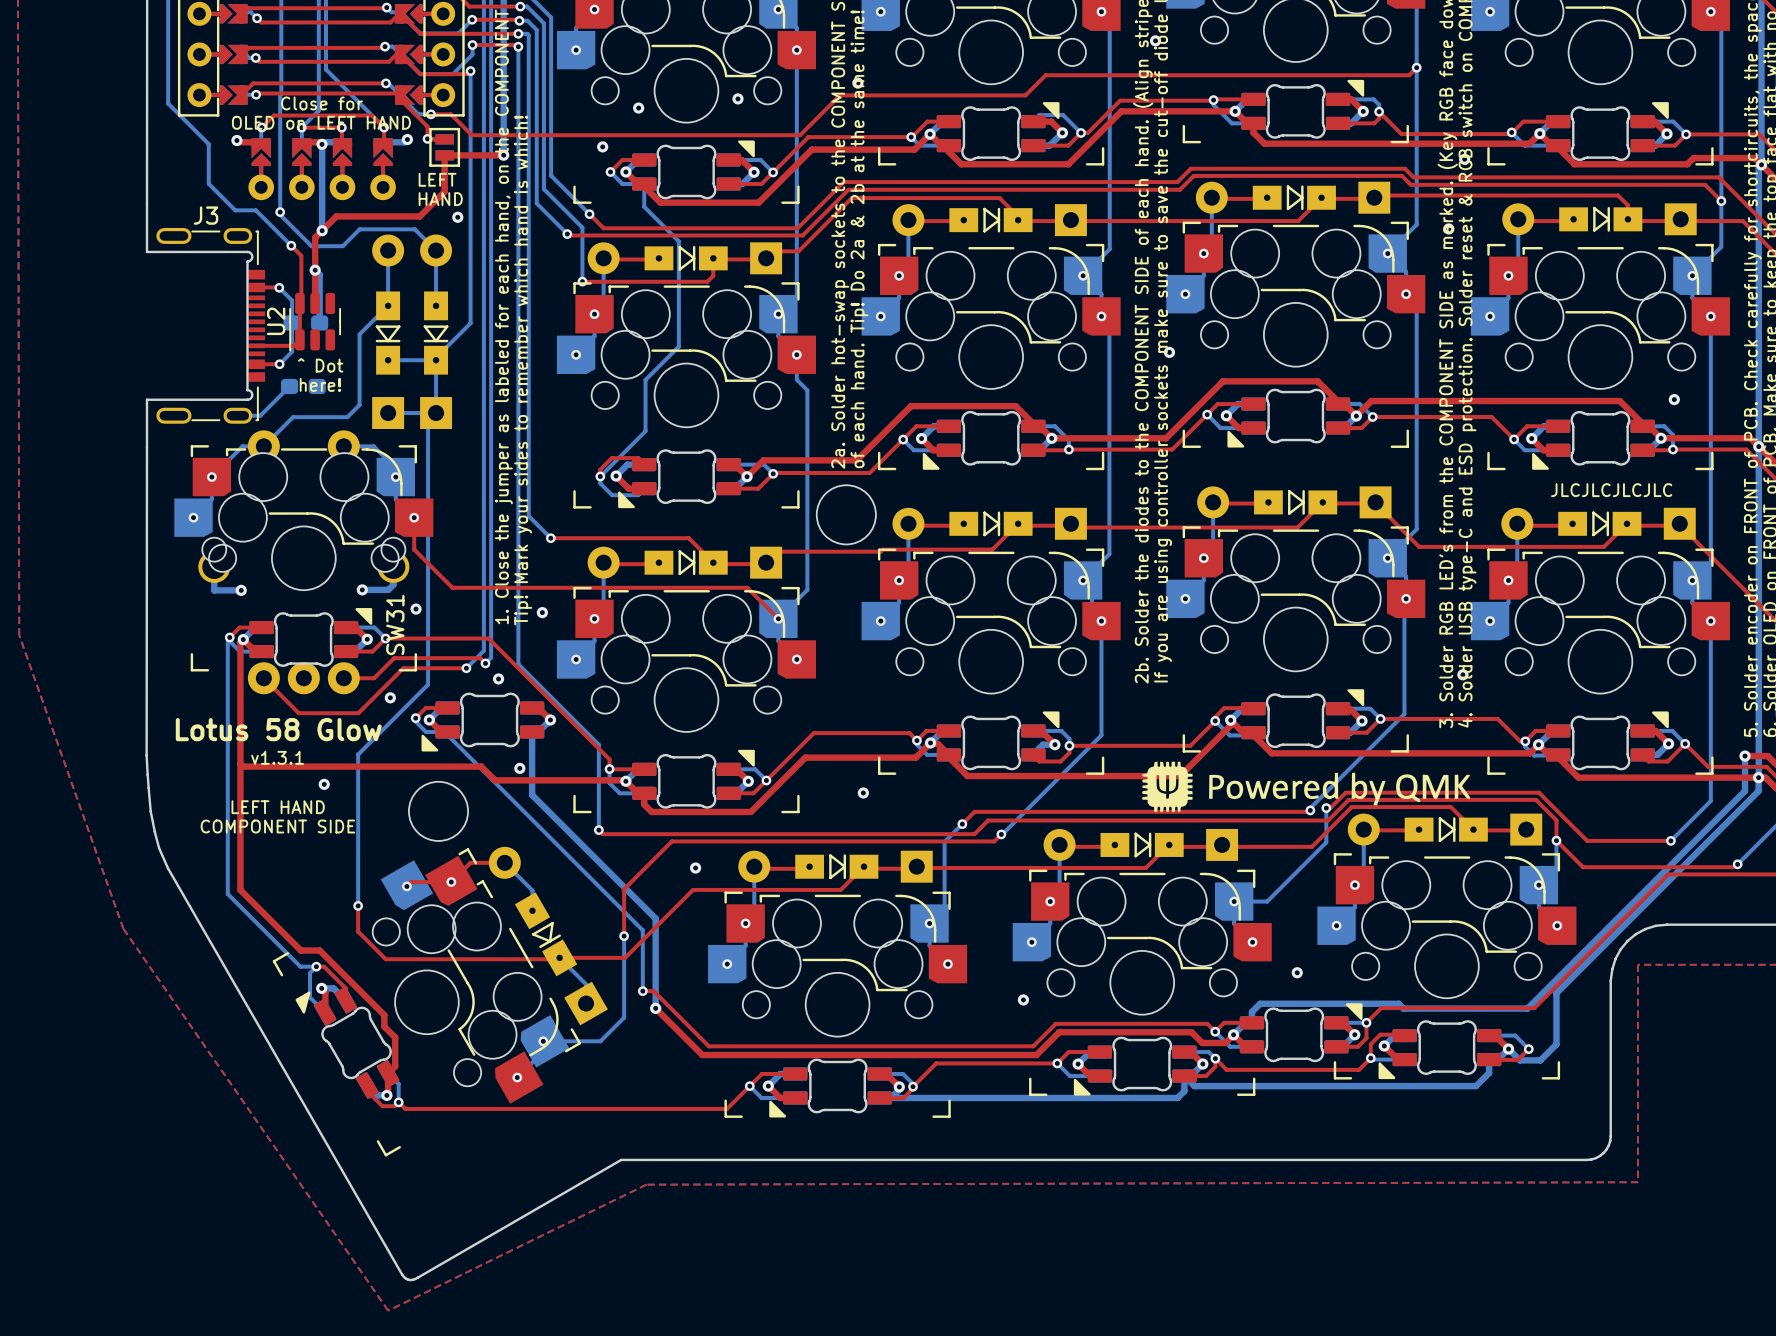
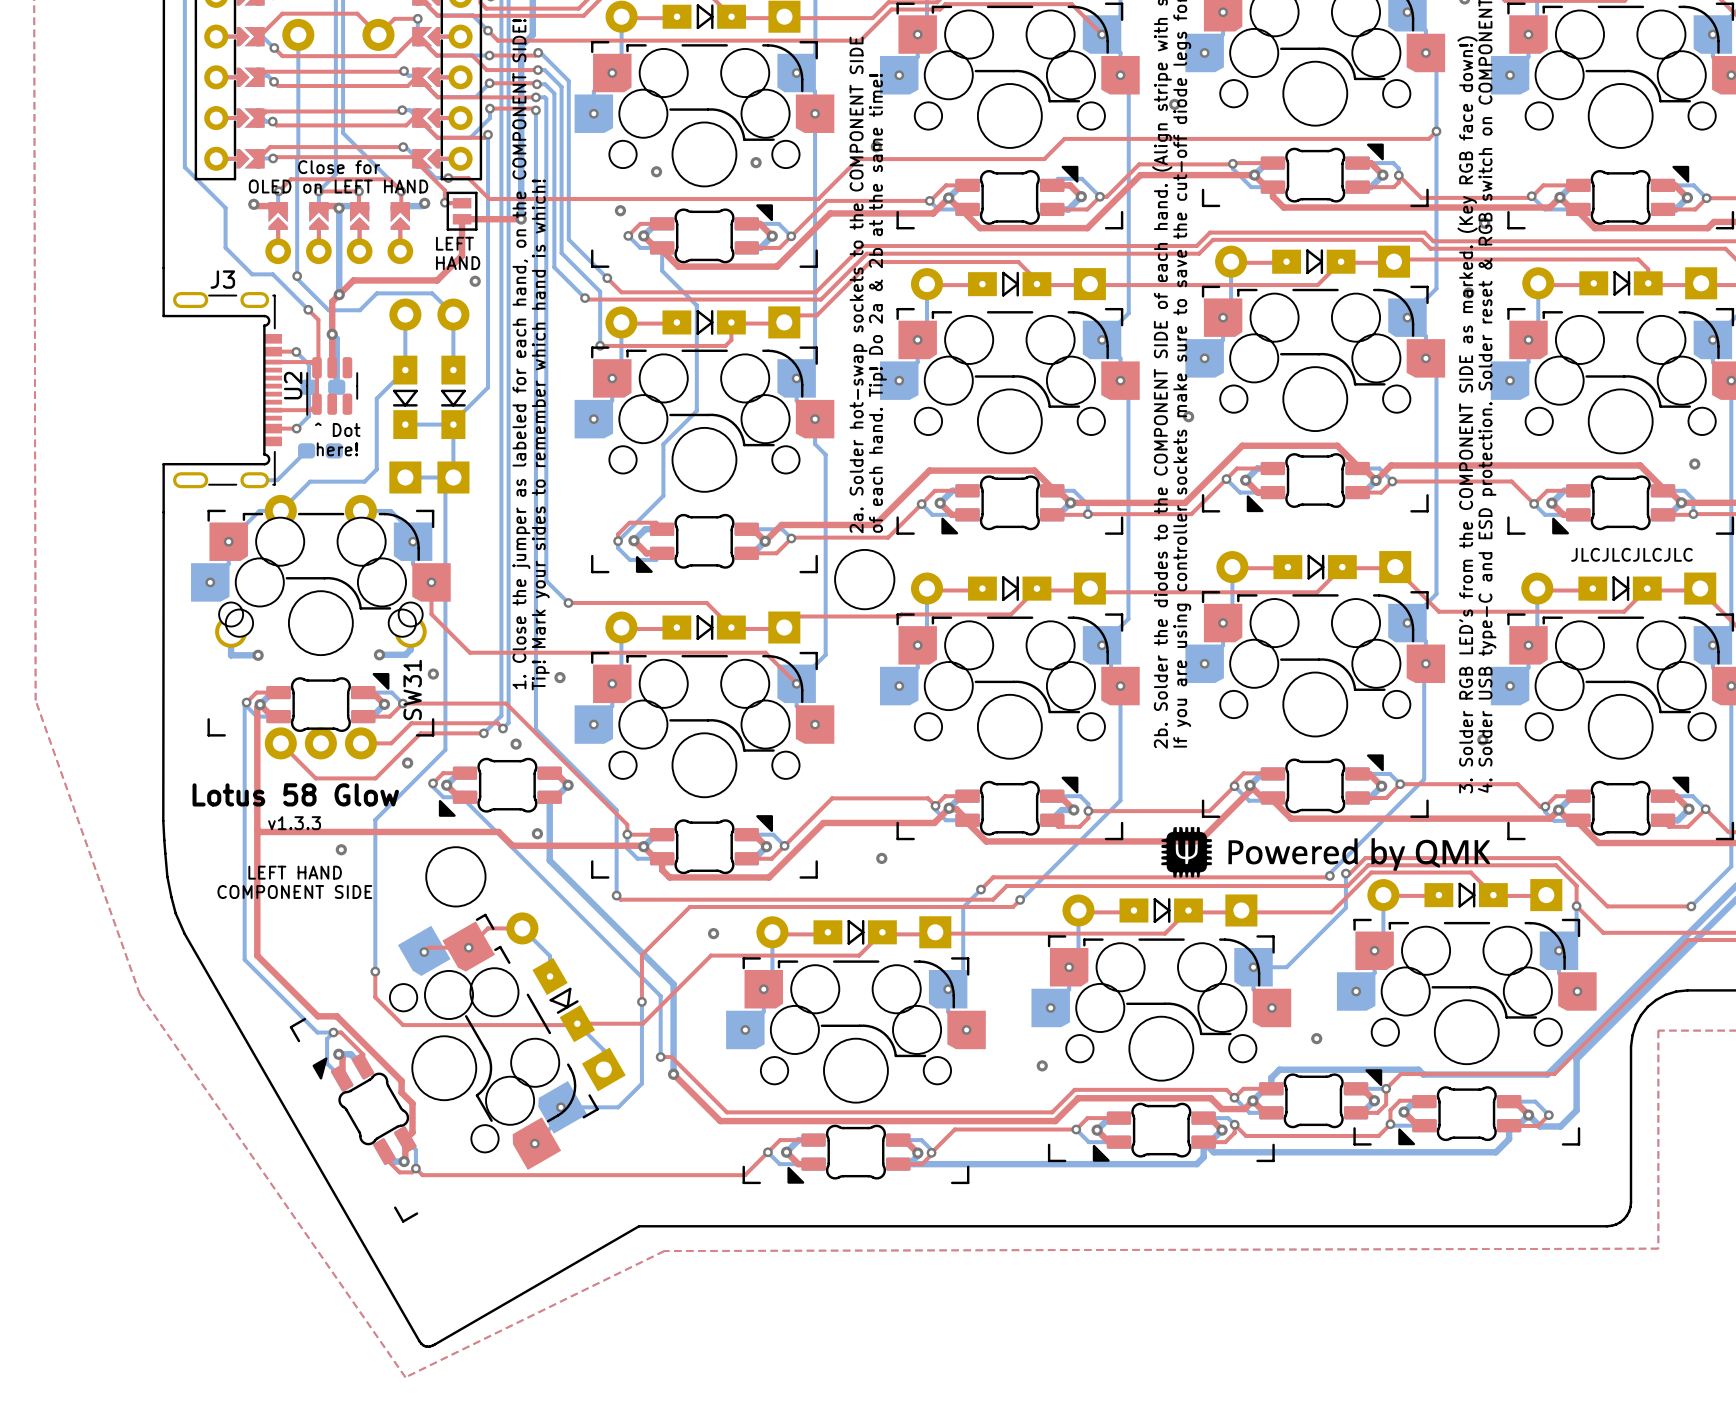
top track: none -> (273, 362) (311, 362) (316, 367)
text: v1.3.1 (277, 757) -> v1.3.3 (294, 823)

